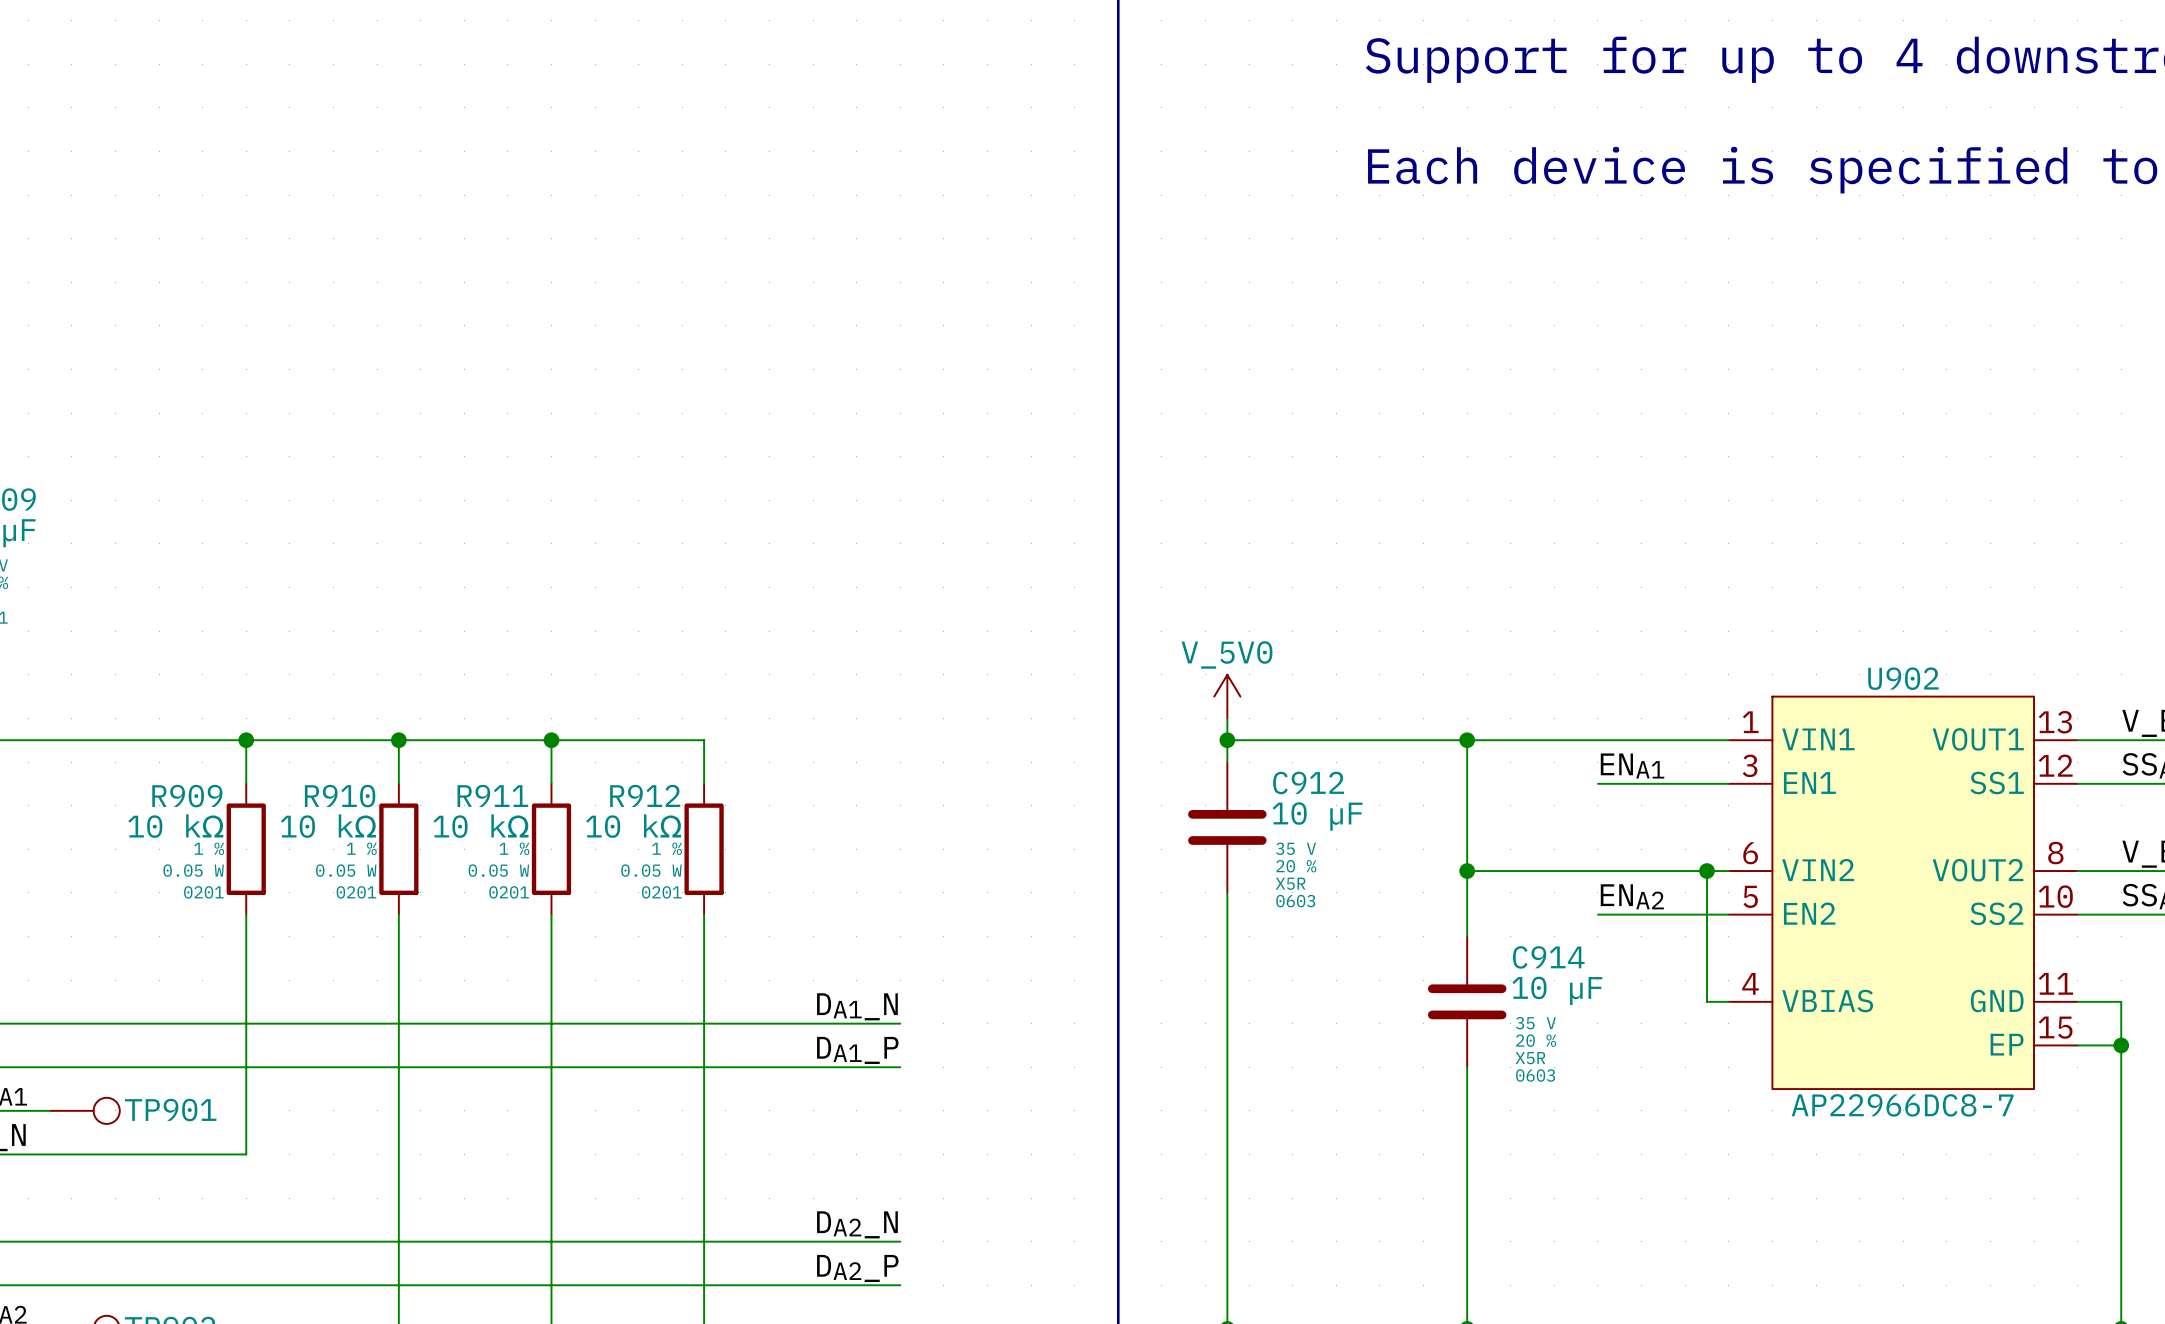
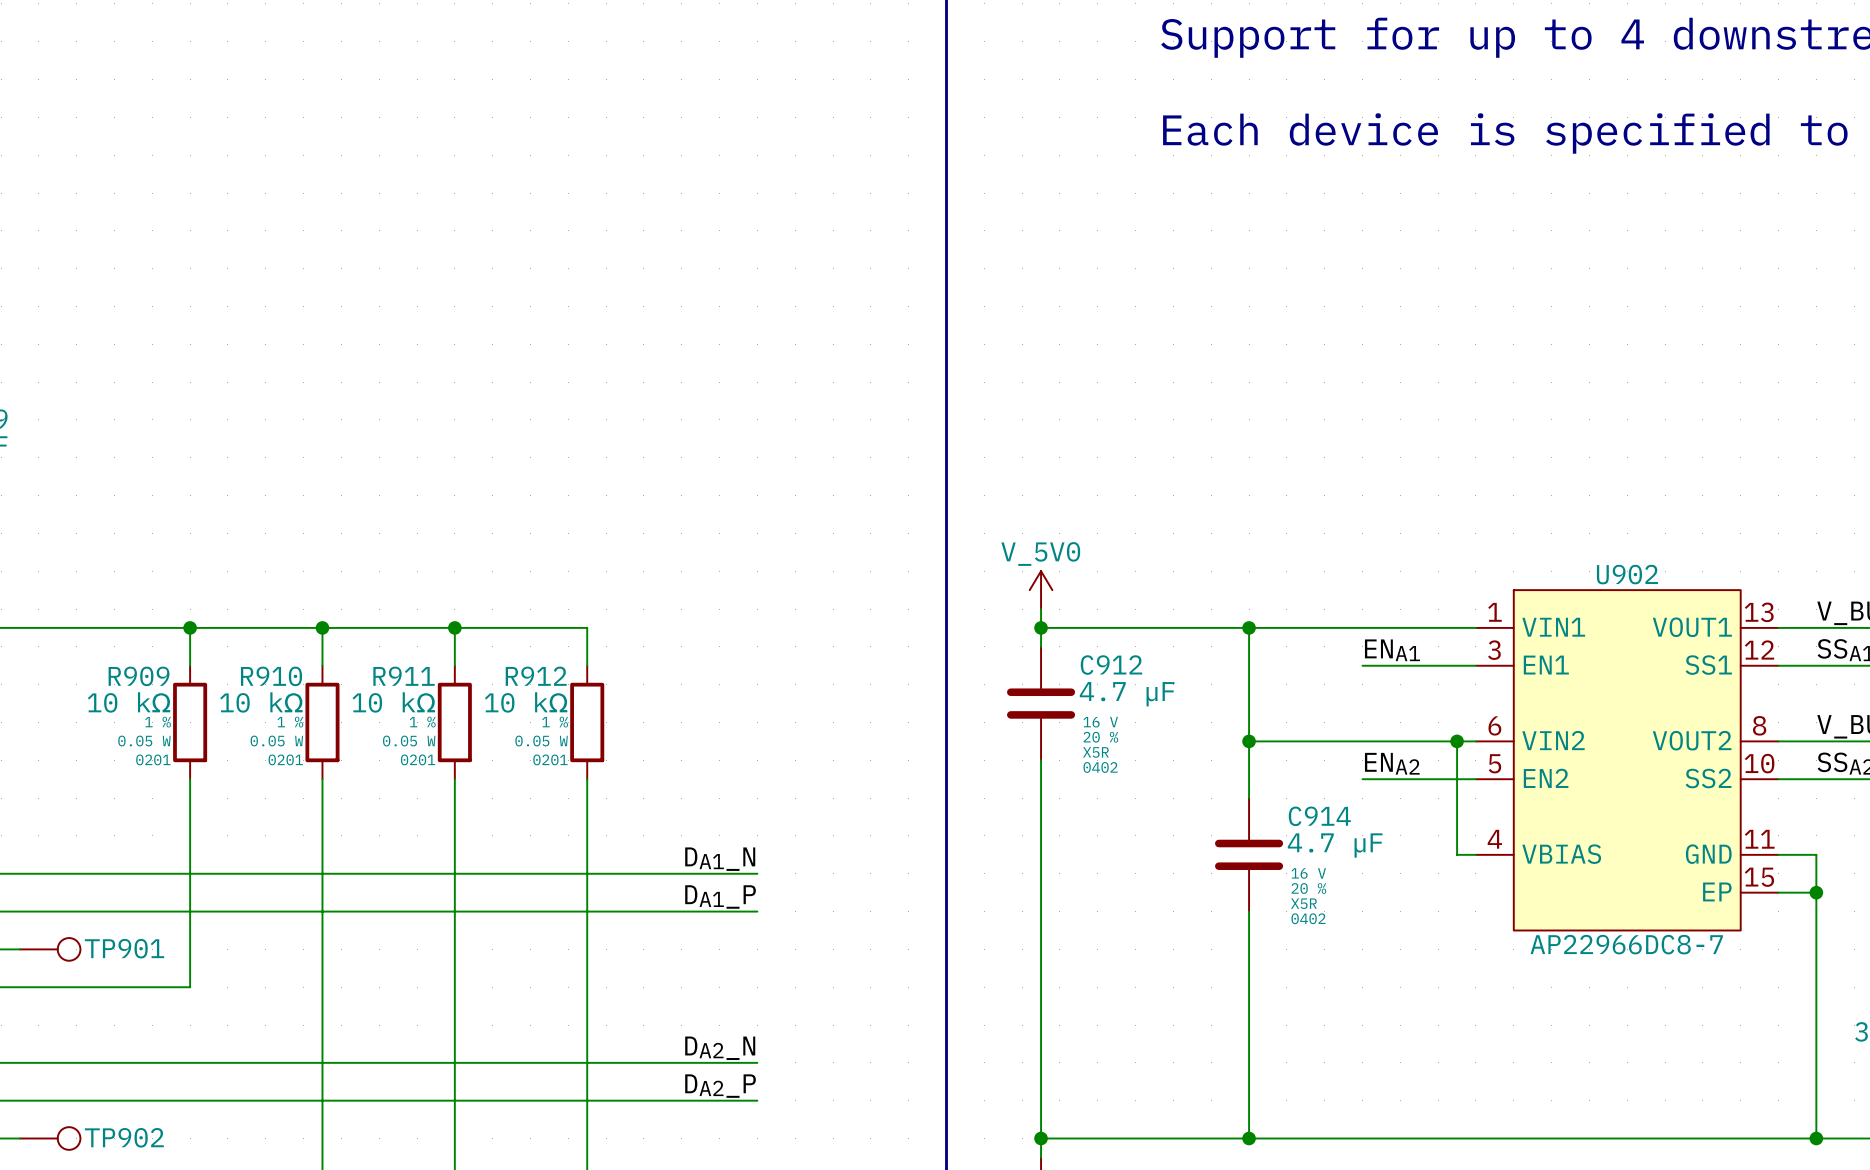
C912 value: 10 µF (1317, 816) -> 4.7 µF (1127, 694)
C912 text: 35 V (1296, 848) -> 16 V (1100, 722)
C912 text: 0603 (1295, 901) -> 0402 (1100, 767)
C914 value: 10 µF (1557, 990) -> 4.7 µF (1335, 845)
C914 text: 35 V (1535, 1023) -> 16 V (1308, 873)
C914 text: 0603 (1535, 1075) -> 0402 (1308, 918)

